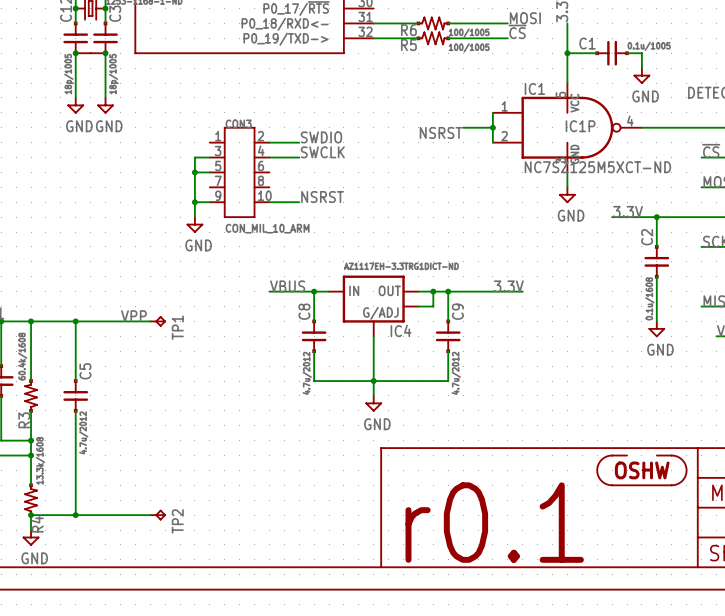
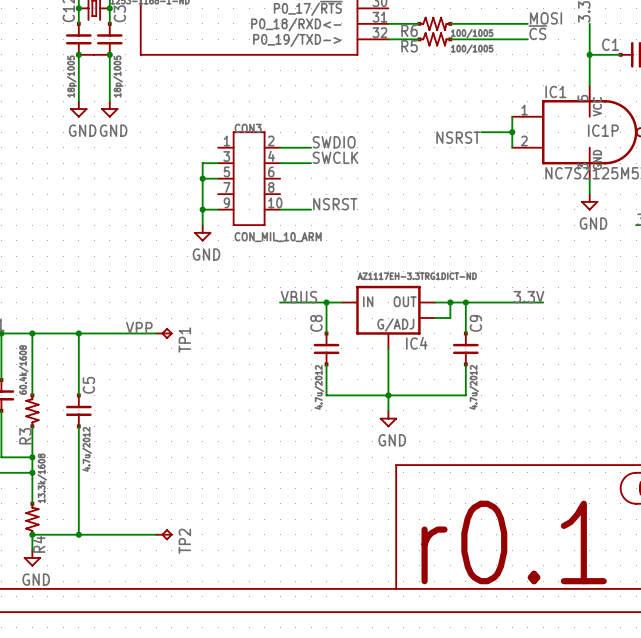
R6 symbol: [416, 16, 451, 30] -> [417, 17, 453, 31]
R5 symbol: [416, 31, 451, 45] -> [417, 32, 453, 47]

